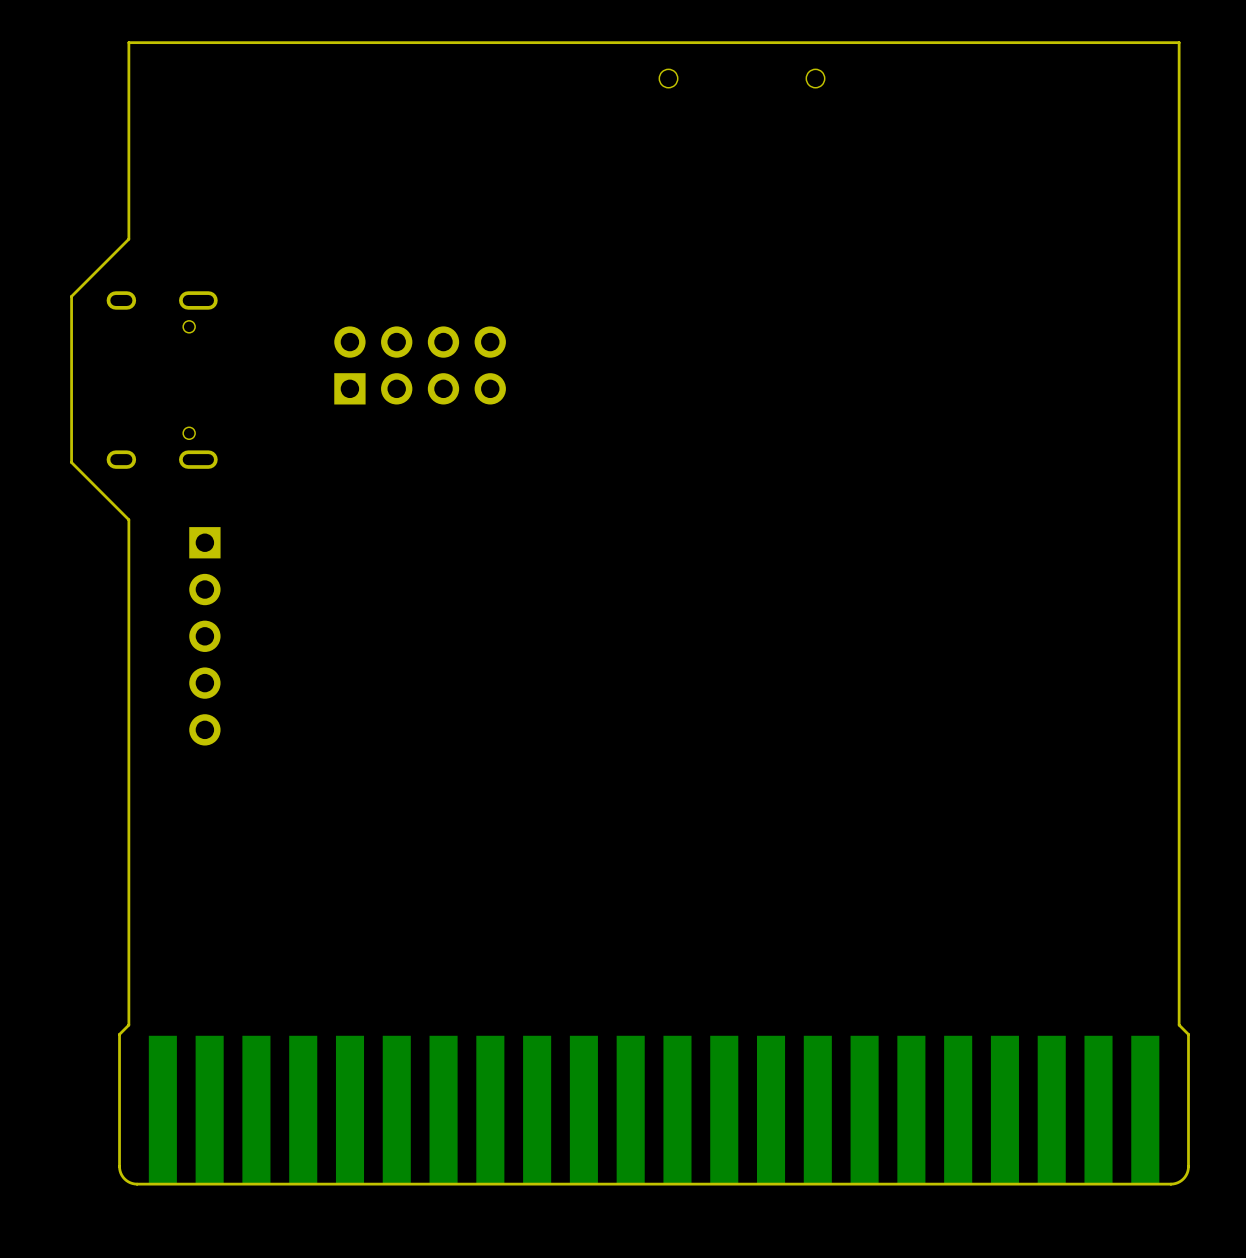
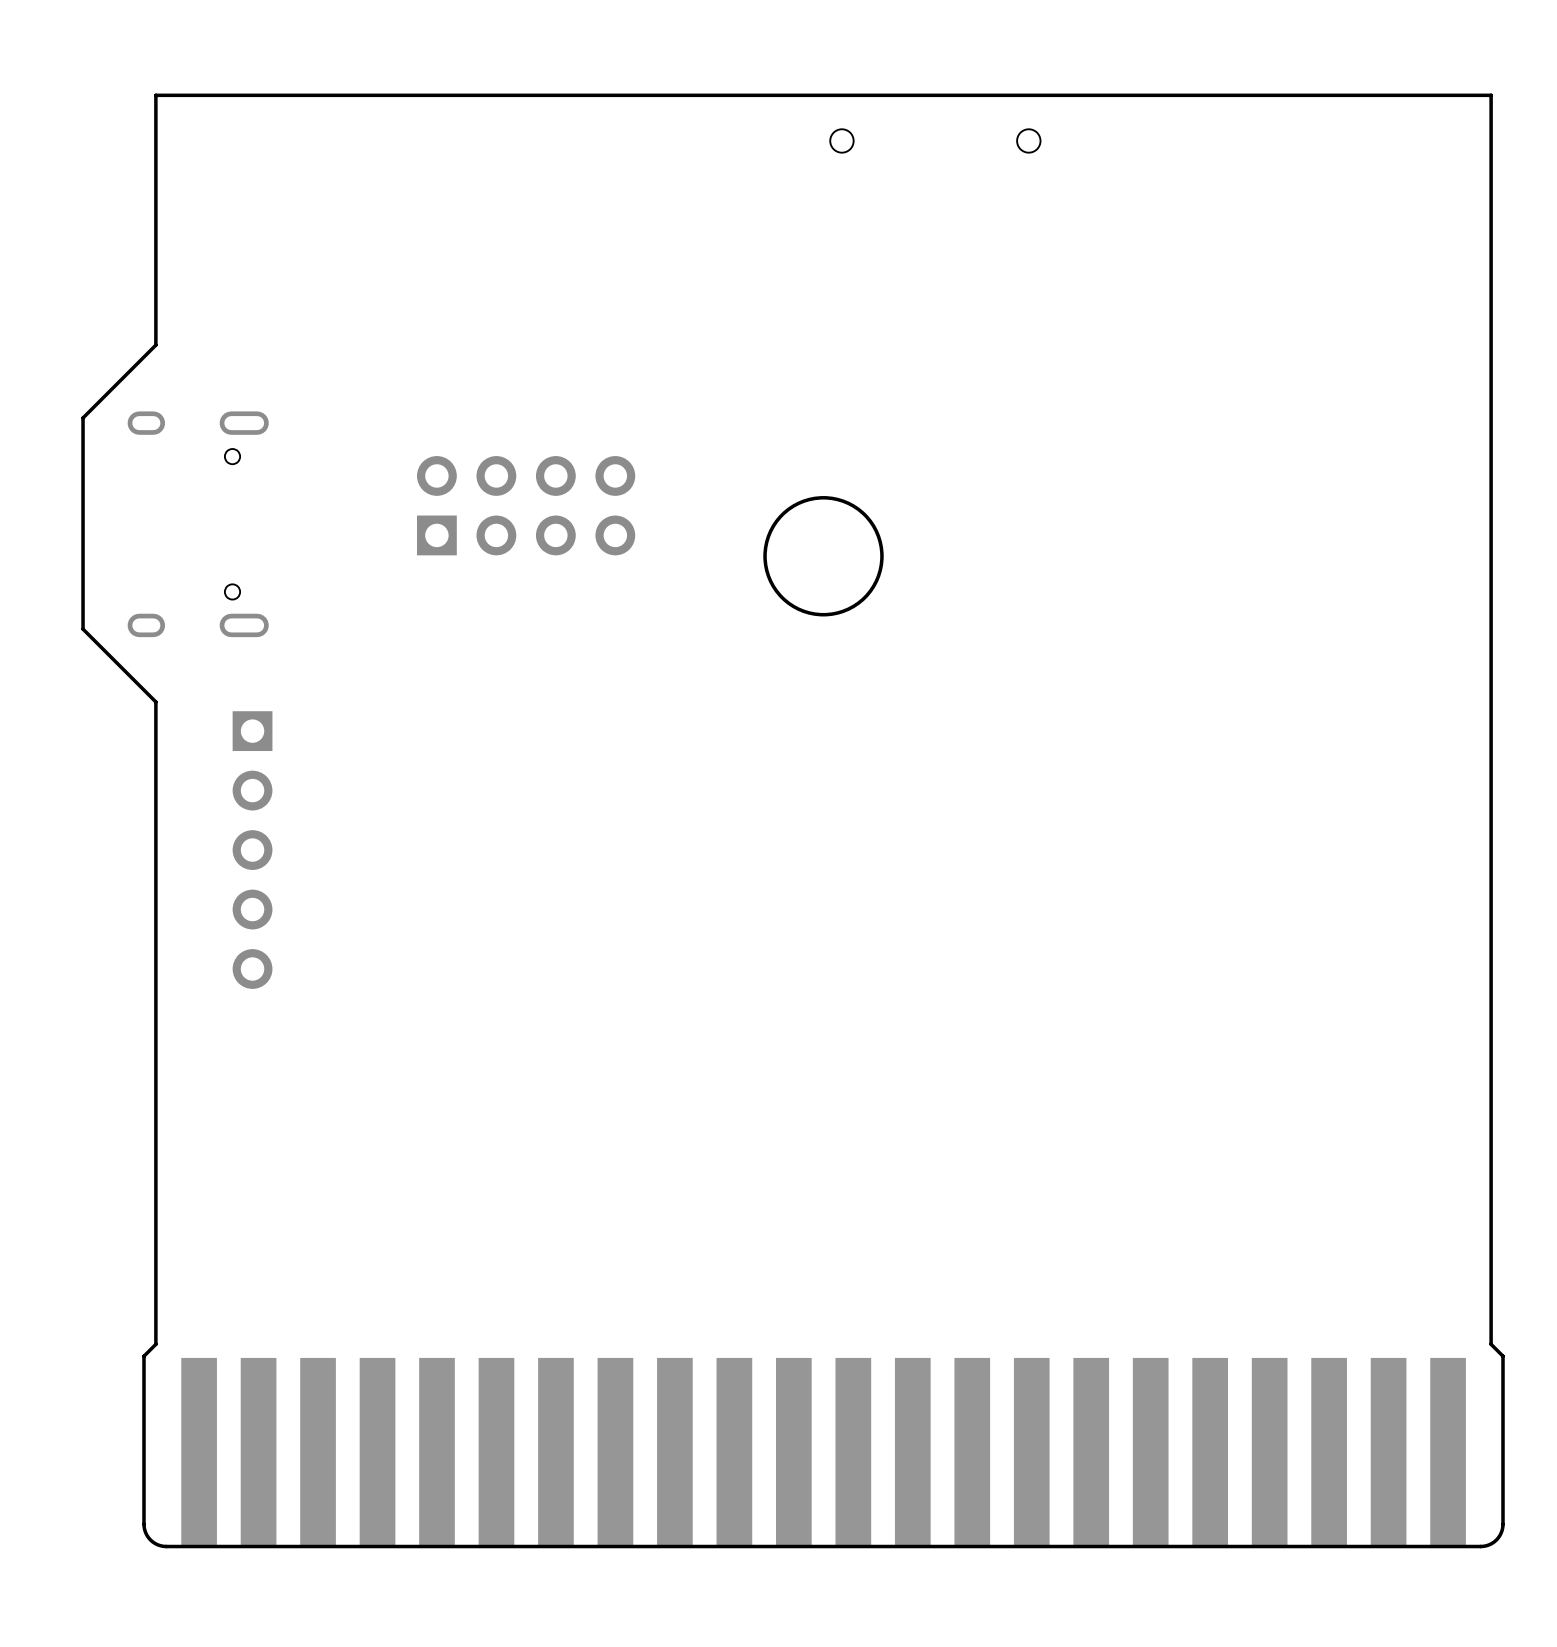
round board edge: none -> [763, 496, 884, 617]

